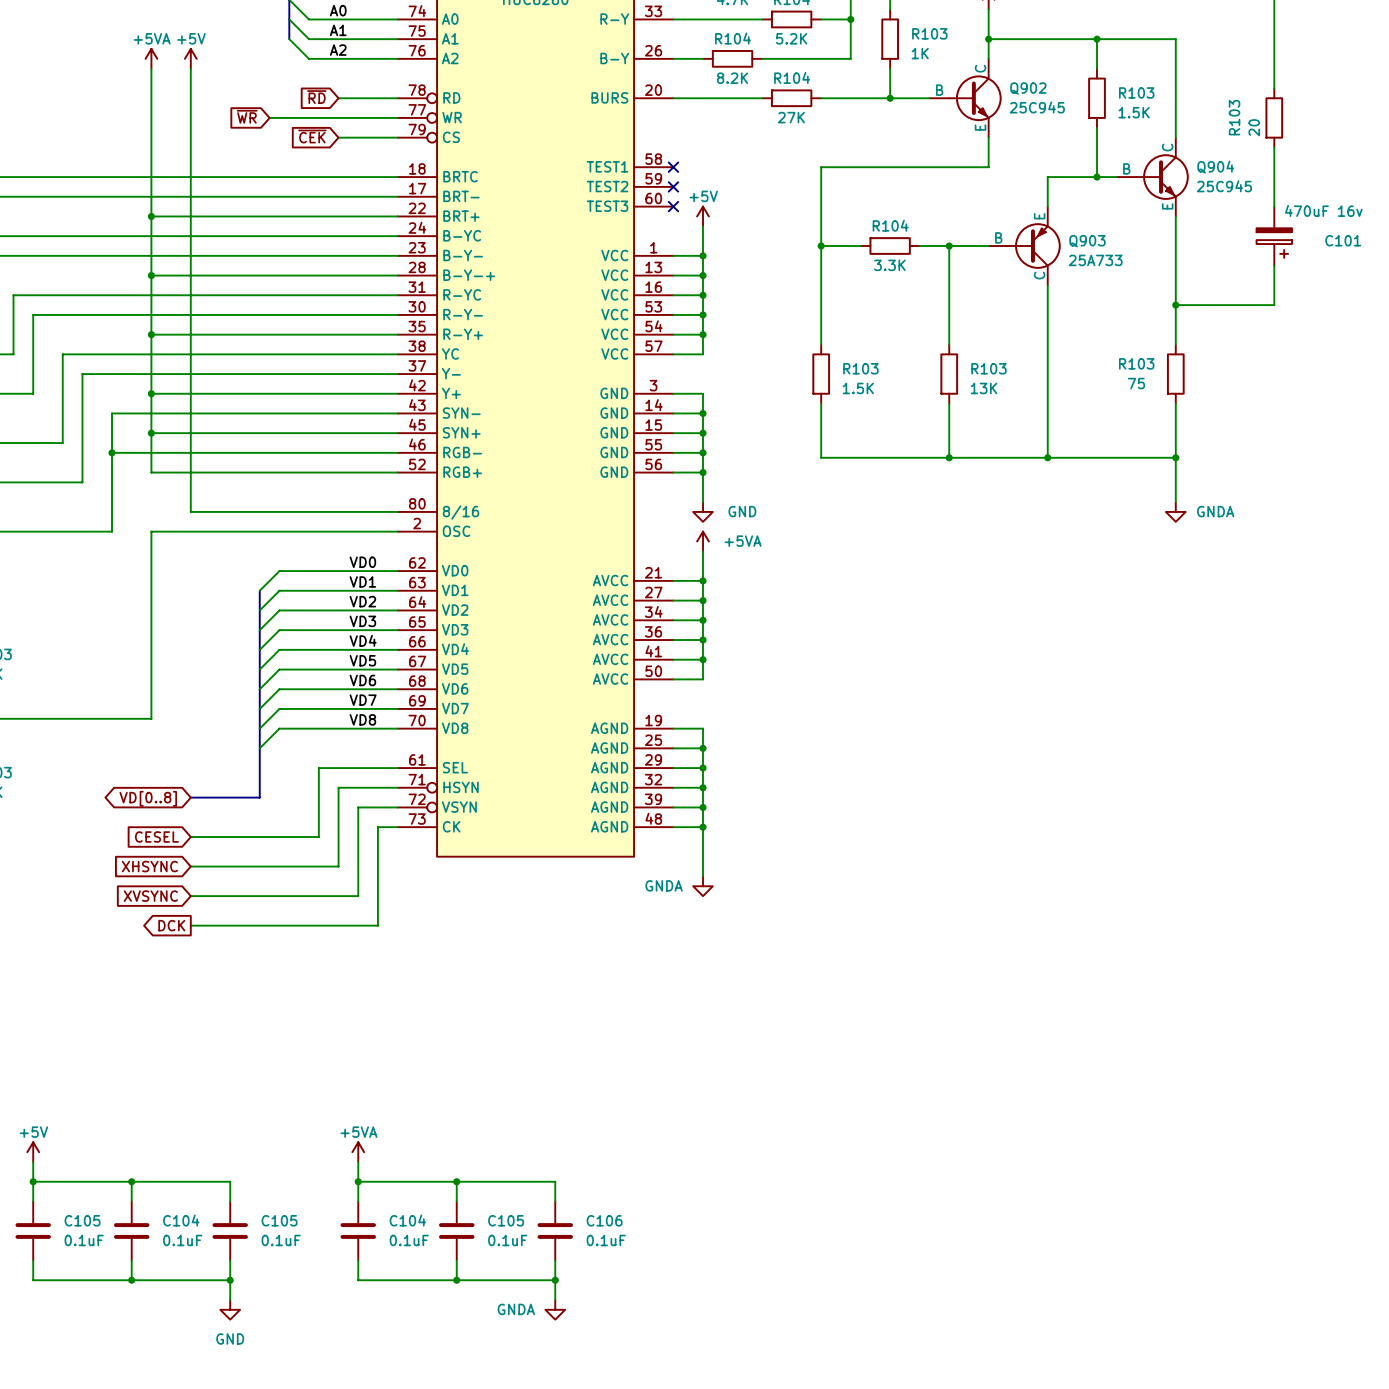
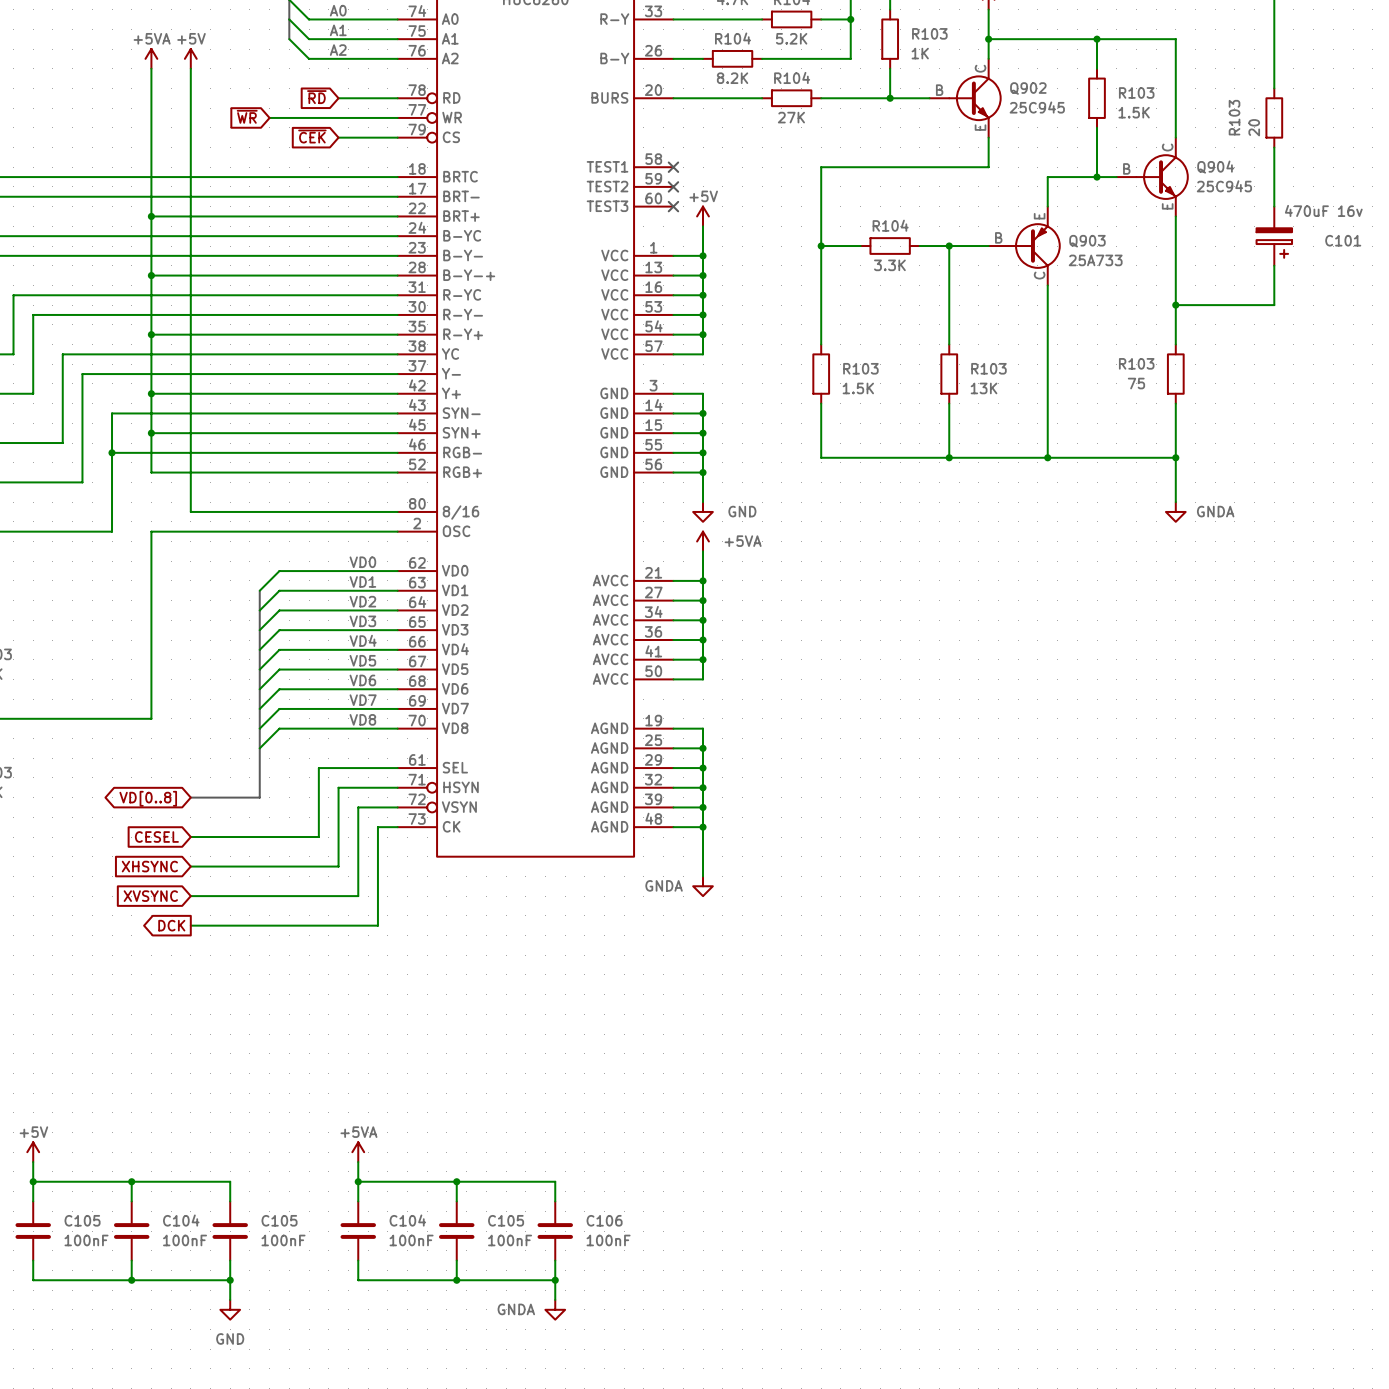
C105 value: 0.1uF (84, 1240) -> 100nF (86, 1240)
C104 value: 0.1uF (182, 1240) -> 100nF (185, 1240)
C105 value: 0.1uF (281, 1240) -> 100nF (283, 1240)
C104 value: 0.1uF (409, 1240) -> 100nF (411, 1240)
C105 value: 0.1uF (507, 1240) -> 100nF (510, 1240)
C106 value: 0.1uF (606, 1240) -> 100nF (608, 1240)

